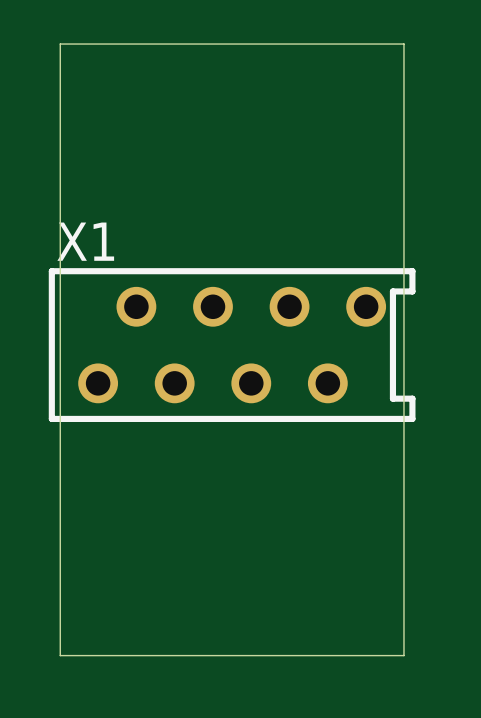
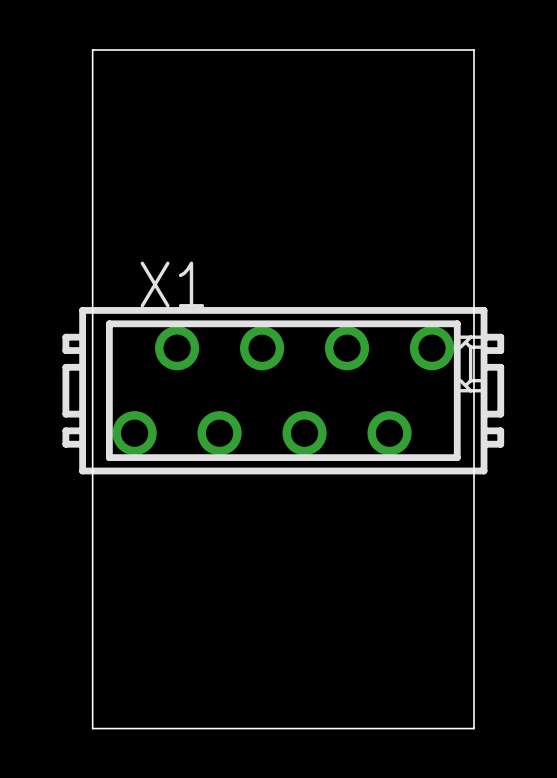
X1 footprint: [48, 268, 416, 422] -> [62, 307, 505, 475]

